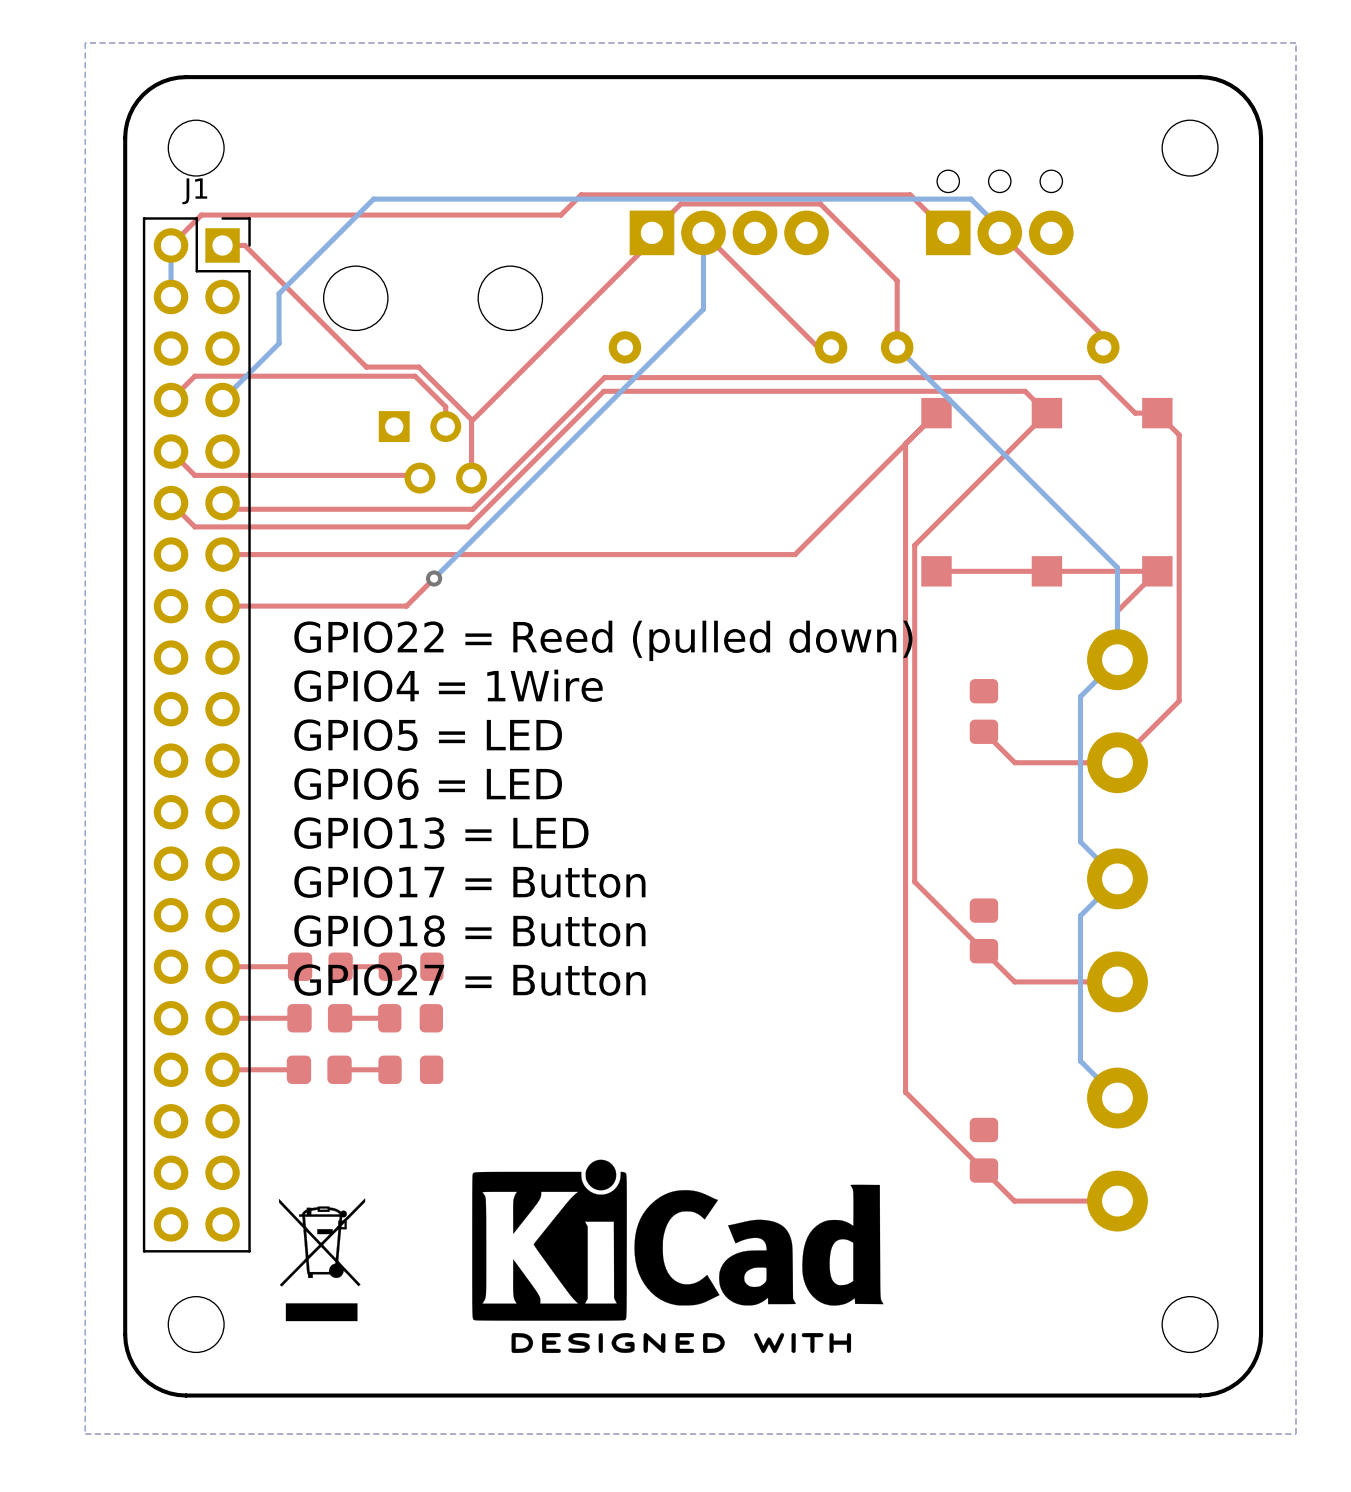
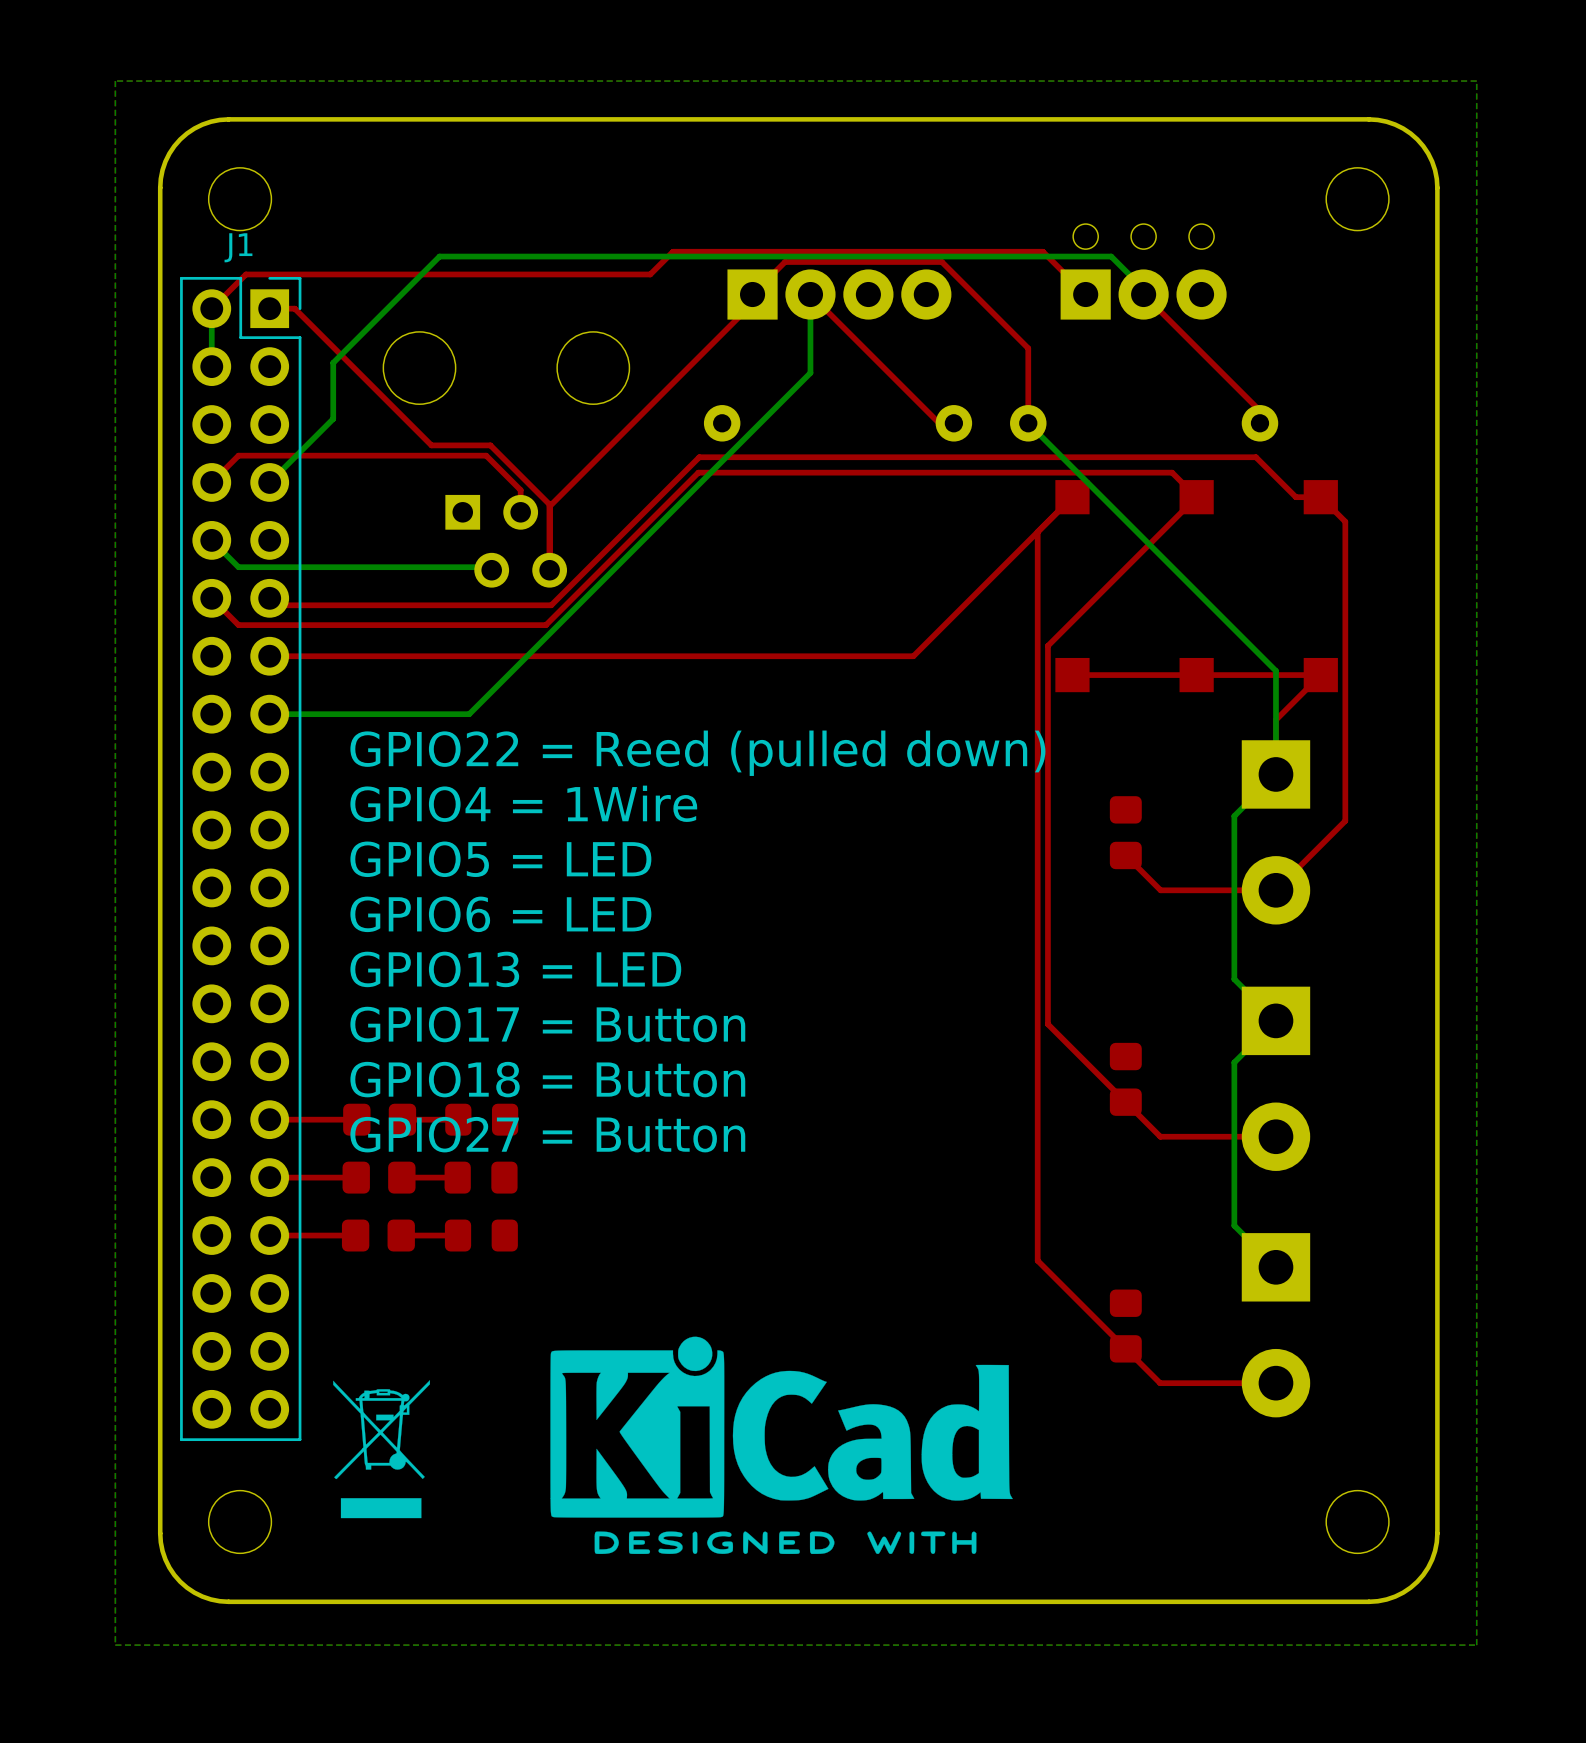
bottom track: (703, 302) (703, 309) (434, 578) -> (810, 372) (469, 714) (269, 714)
top track: (171, 451) (194, 475) (417, 475) -> none
bottom track: none -> (211, 540) (238, 567) (488, 567)
top track: (434, 578) (406, 606) (222, 606) -> none
via: (434, 578) -> none
part footprint: [1087, 629, 1148, 794] -> [1241, 740, 1311, 925]
part footprint: [1087, 848, 1148, 1013] -> [1241, 986, 1311, 1171]
part footprint: [1087, 1067, 1148, 1232] -> [1241, 1233, 1311, 1418]

